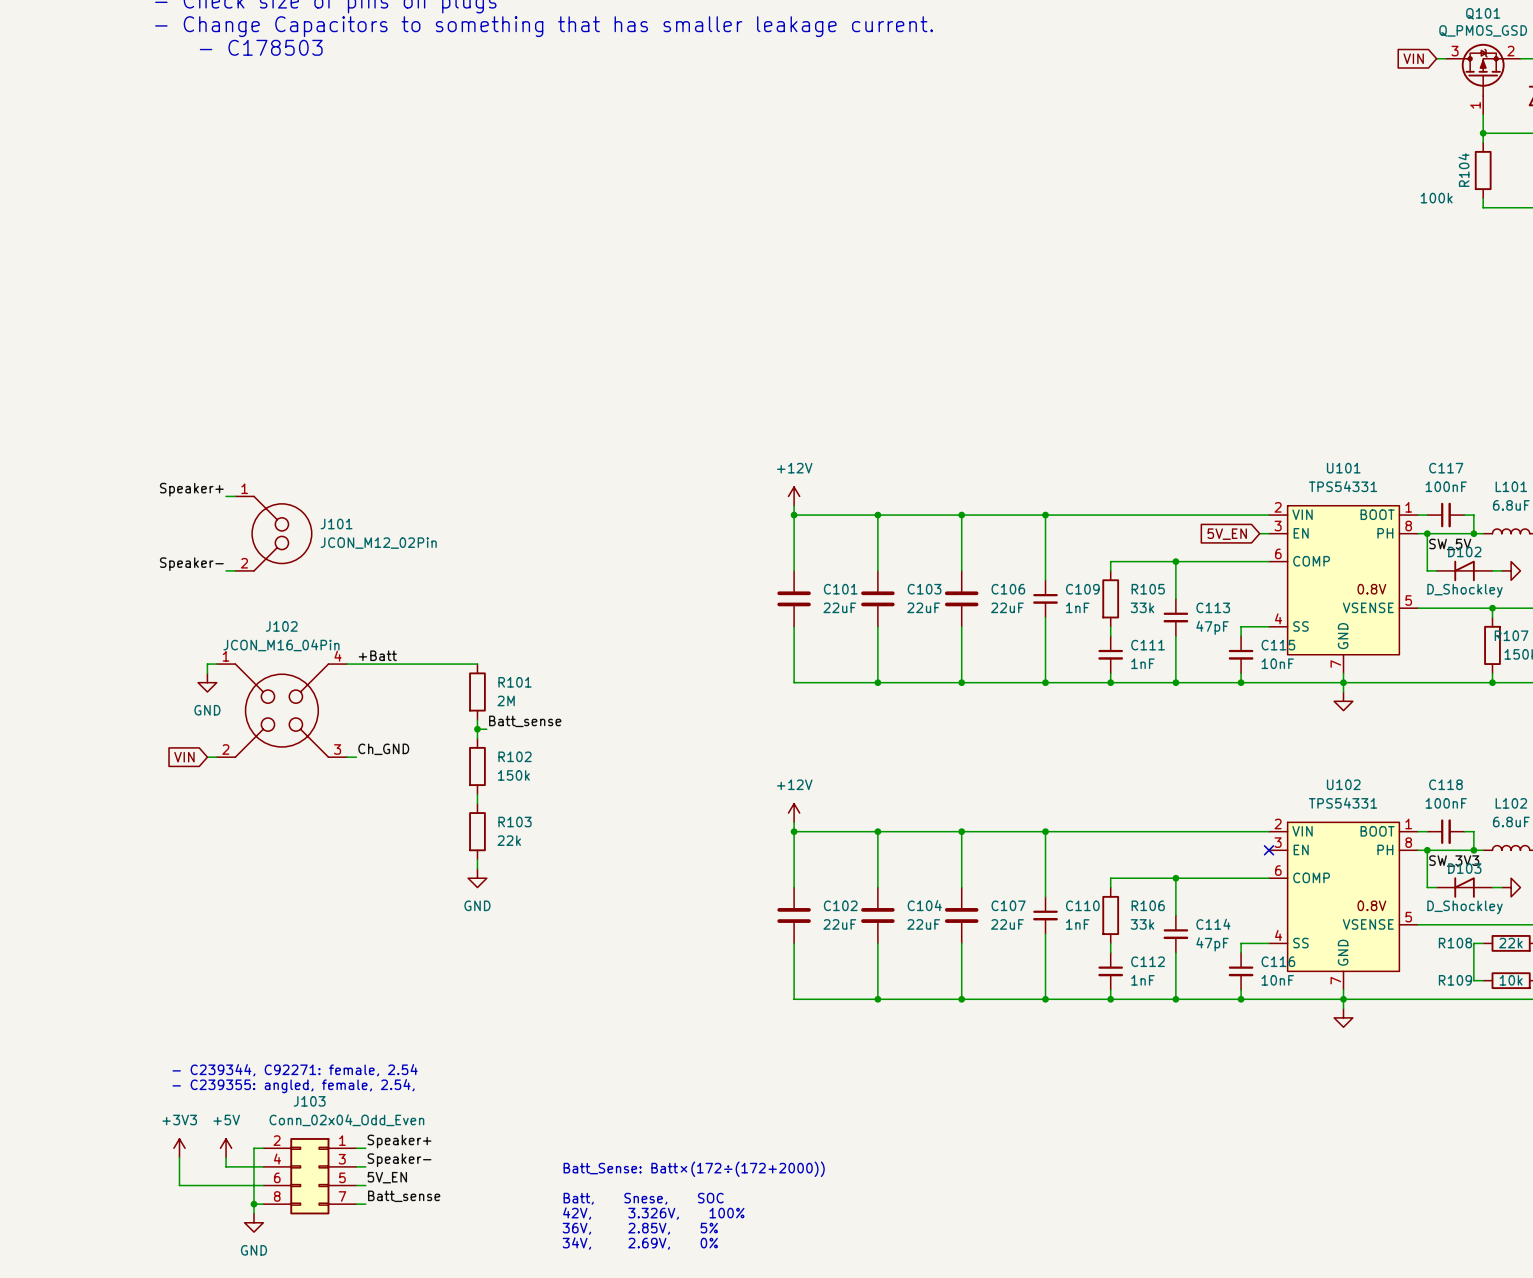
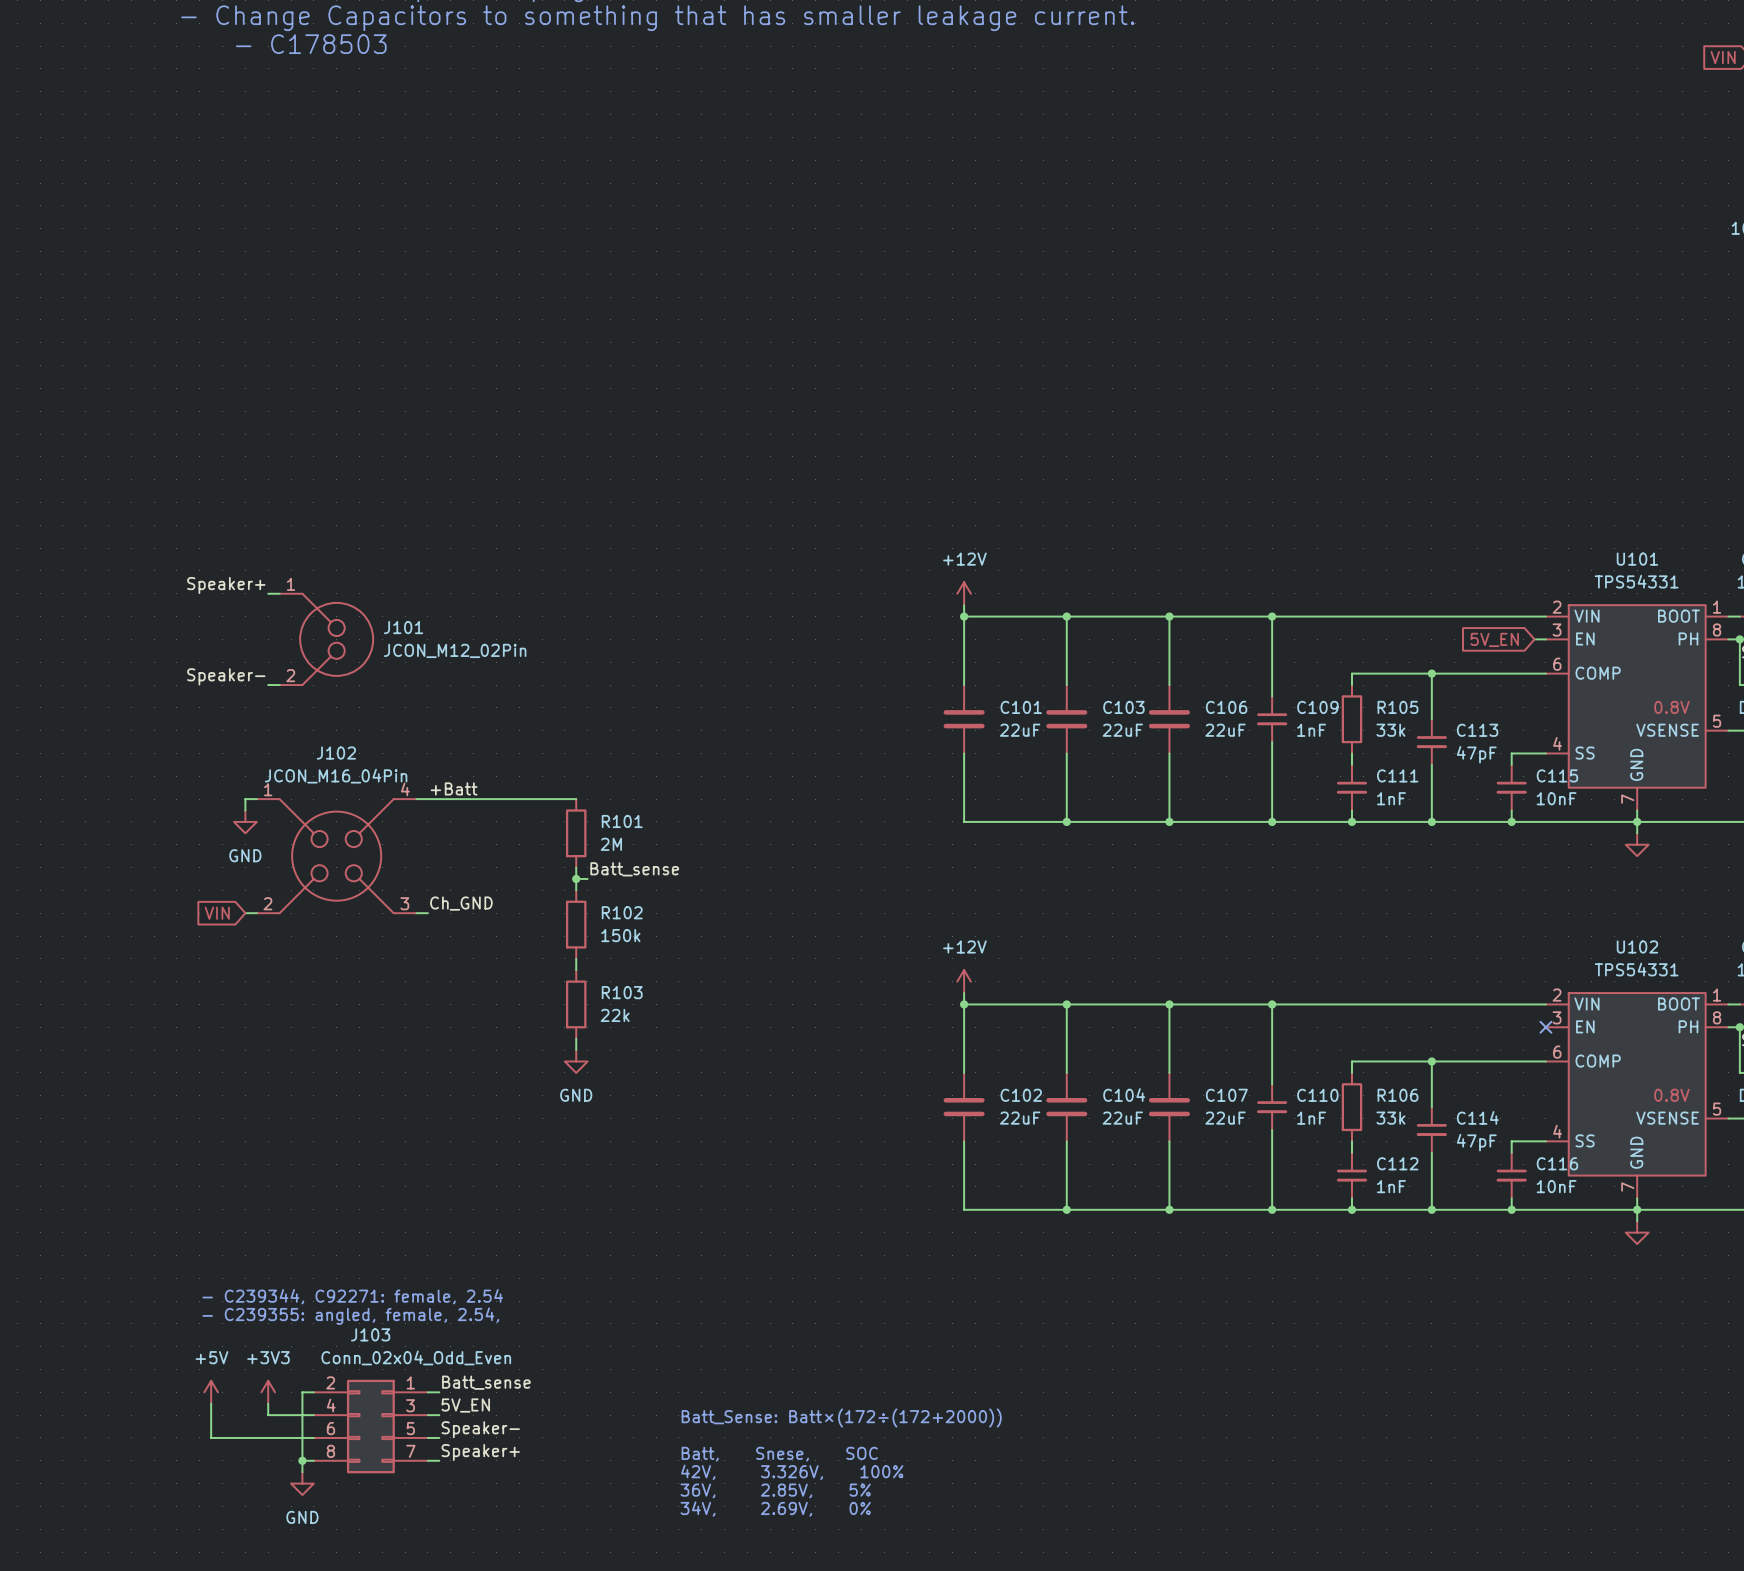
label: Speaker+ (399, 1141) -> Batt_sense (486, 1382)
power symbol: +3V3 (179, 1148) -> +5V (211, 1392)
power symbol: +5V (226, 1148) -> +3V3 (268, 1392)
label: Speaker- (399, 1160) -> 5V_EN (465, 1405)
label: 5V_EN (387, 1177) -> Speaker- (480, 1429)
label: Batt_sense (404, 1196) -> Speaker+ (480, 1452)

